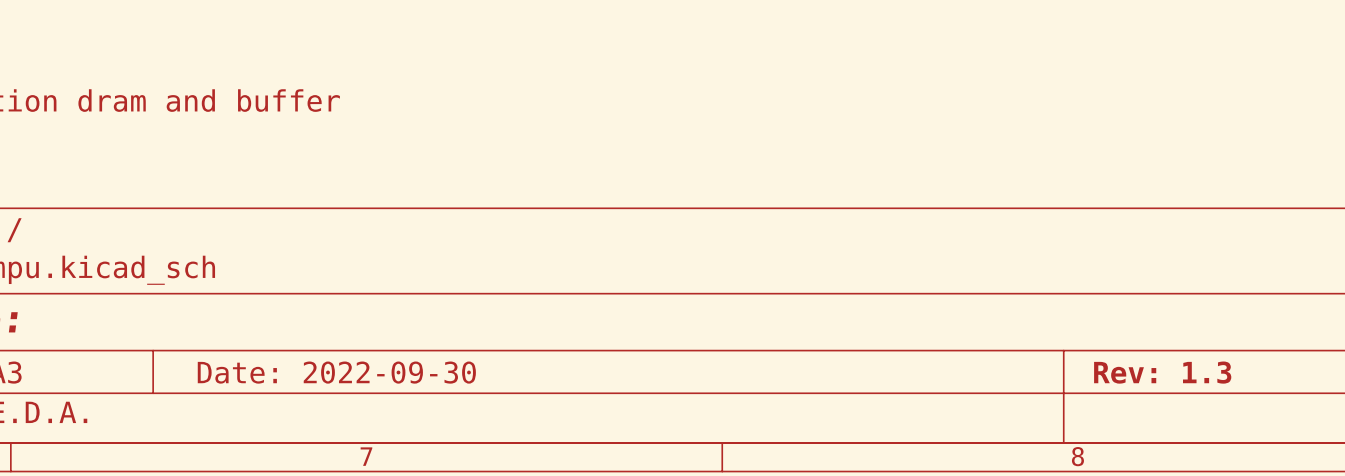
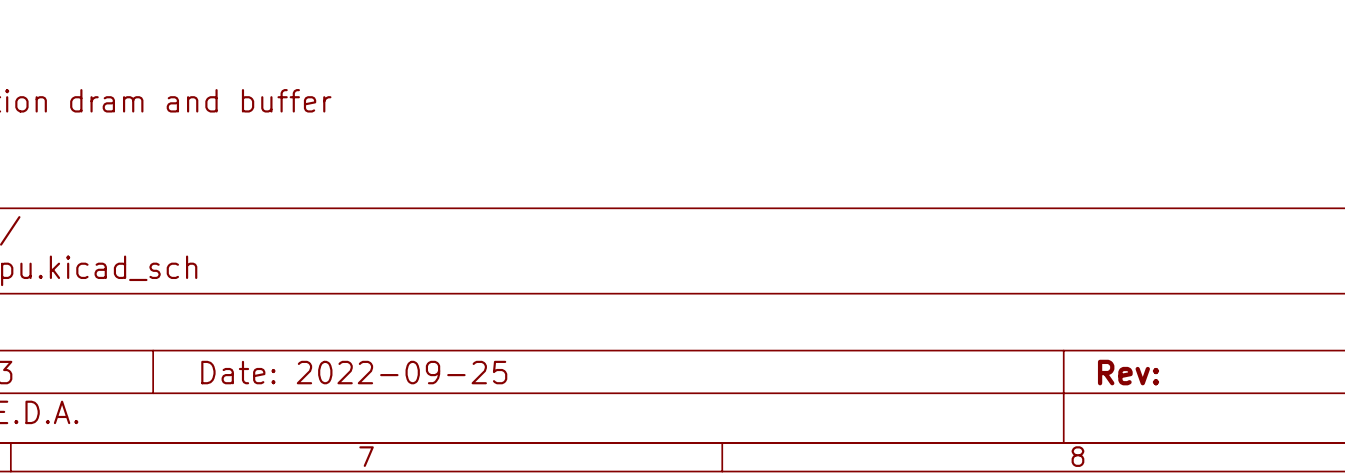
title block: Date: 2022-09-30 (336, 372) -> Date: 2022-09-25 (354, 372)
title block: Rev: 1.3 (1162, 372) -> Rev: (1128, 372)

